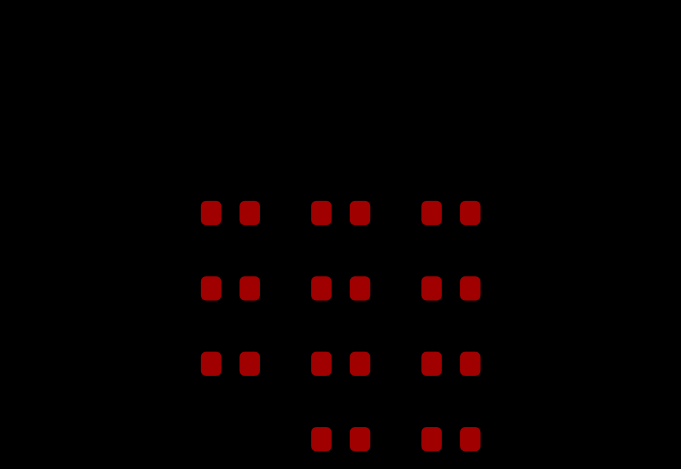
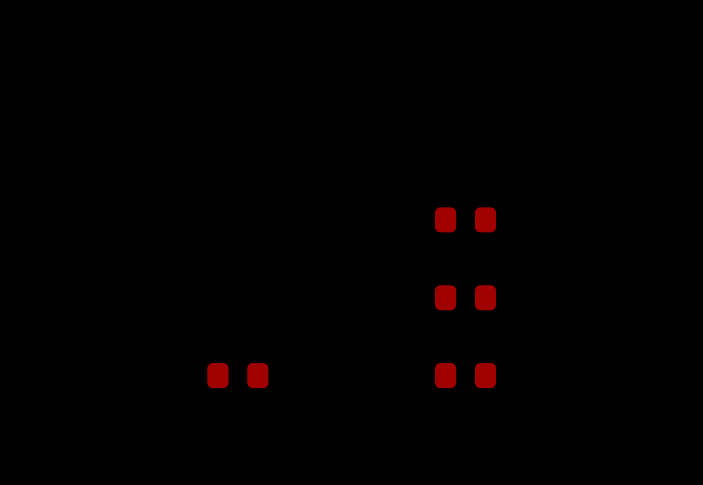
part: (230, 212) -> none
part: (340, 212) -> none
part: (230, 288) -> none
part: (340, 288) -> none
part: (340, 363) -> none
part: (340, 439) -> none
part: (450, 439) -> none

